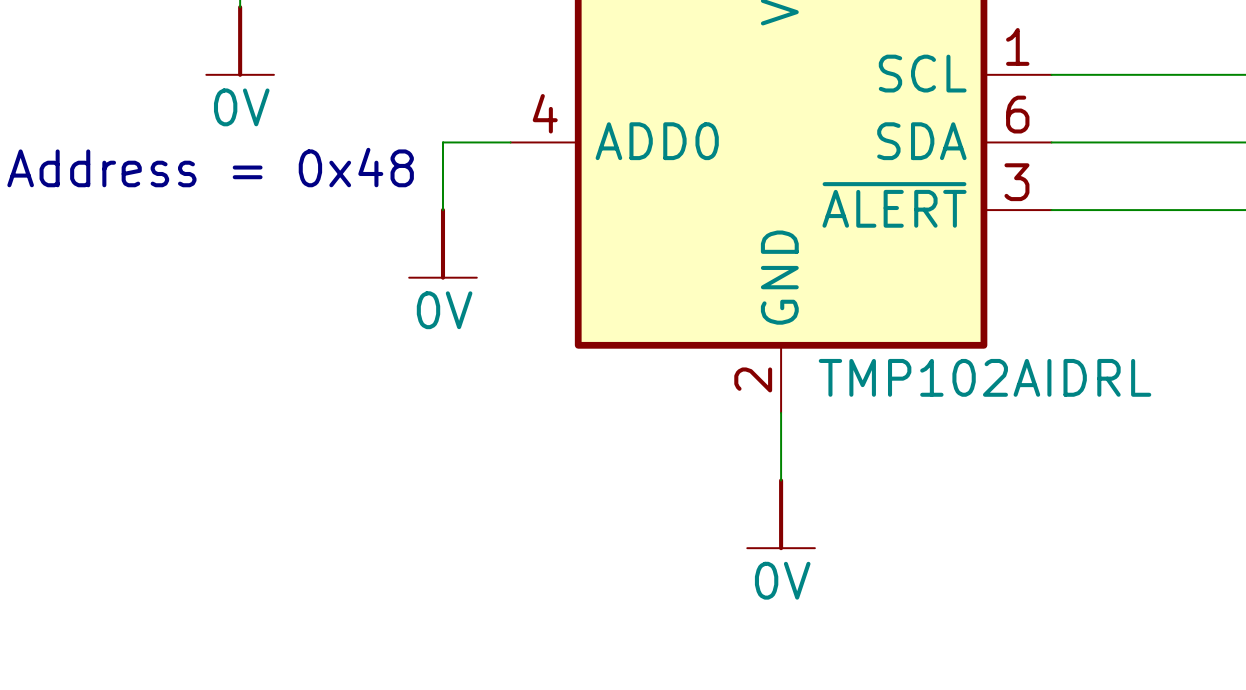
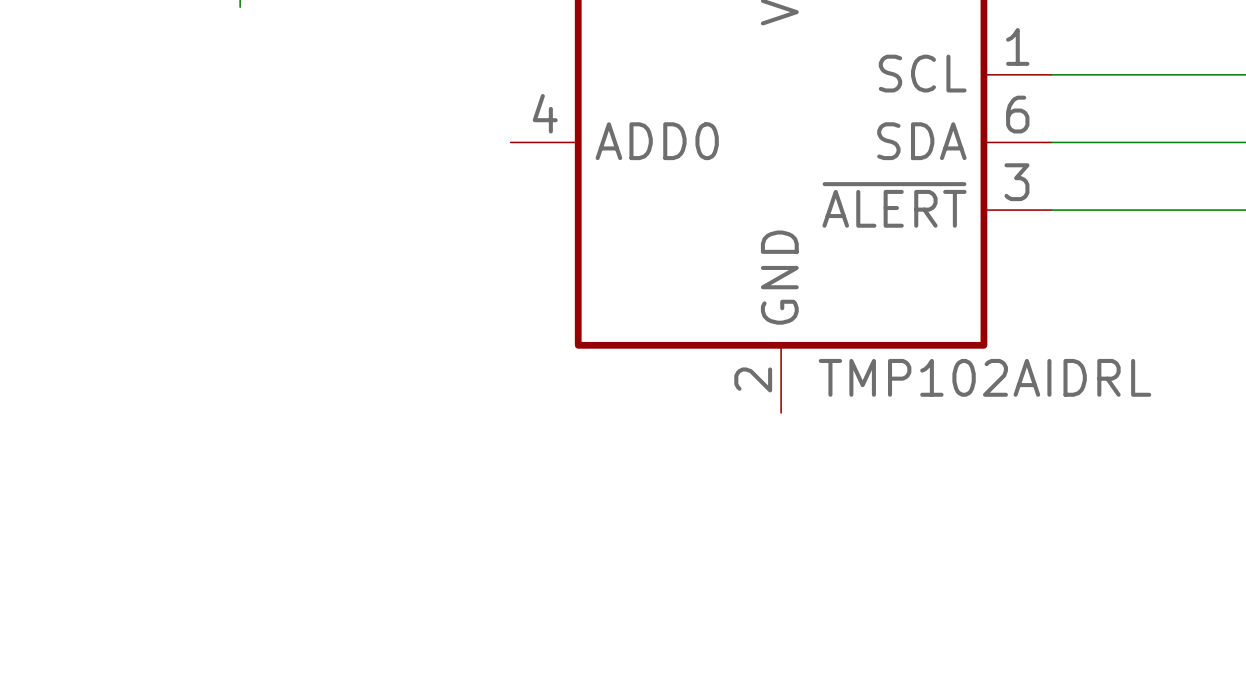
power symbol: 0V (240, 41) -> none
wire: (510, 142) (442, 142) (442, 210) -> none
text: Address = 0x48 (210, 167) -> none
power symbol: 0V (442, 243) -> none
wire: (781, 412) (781, 480) -> none
power symbol: 0V (781, 514) -> none

